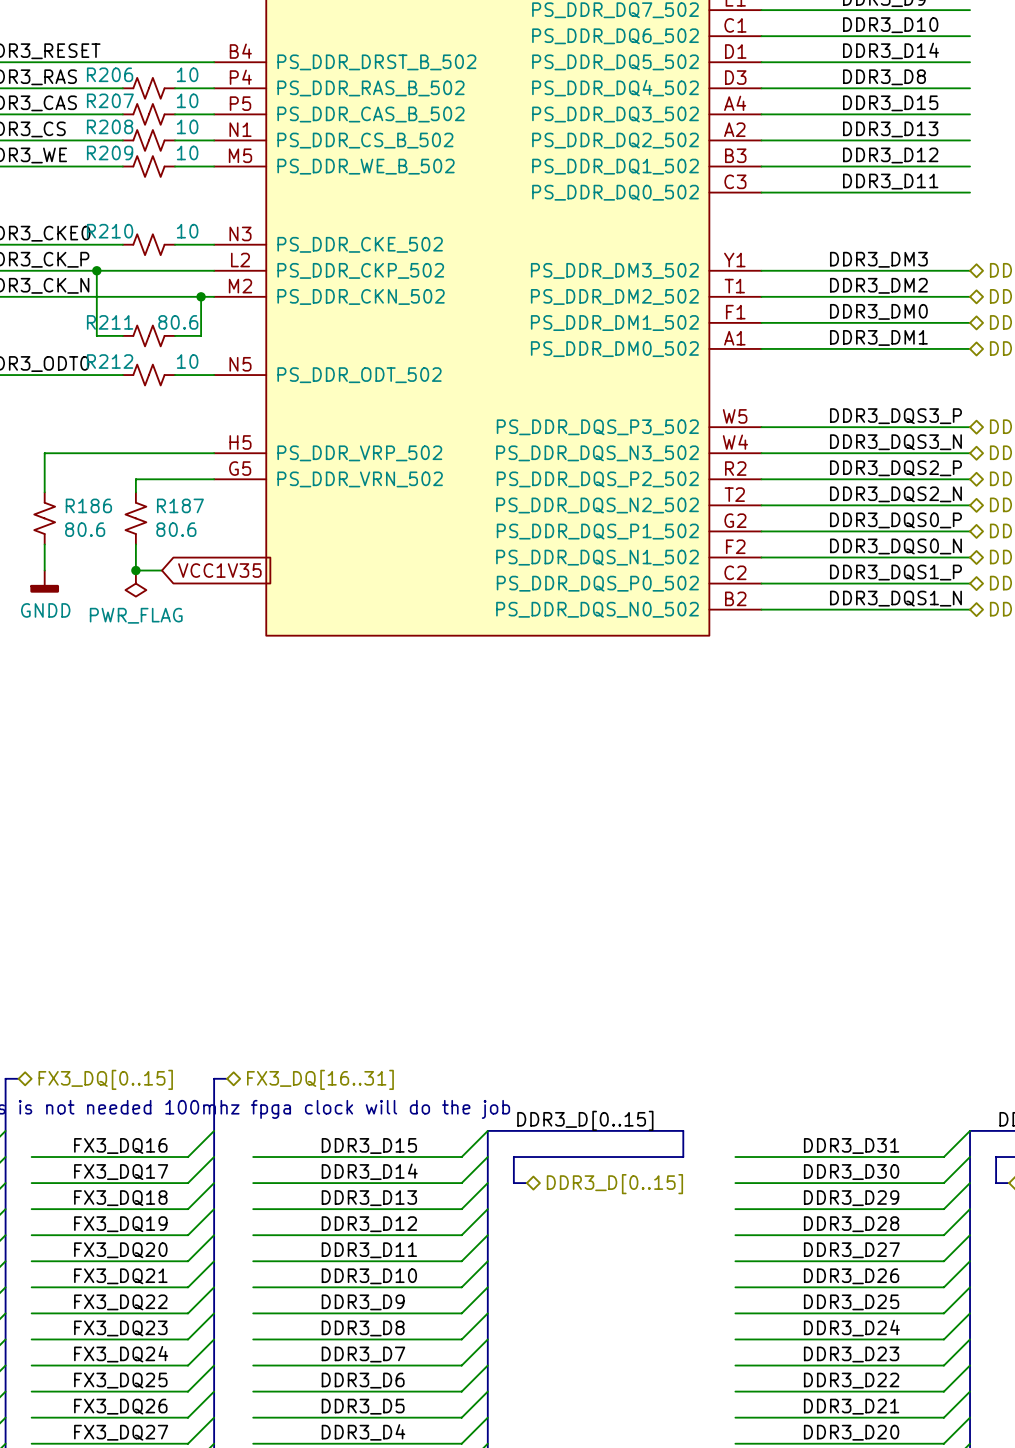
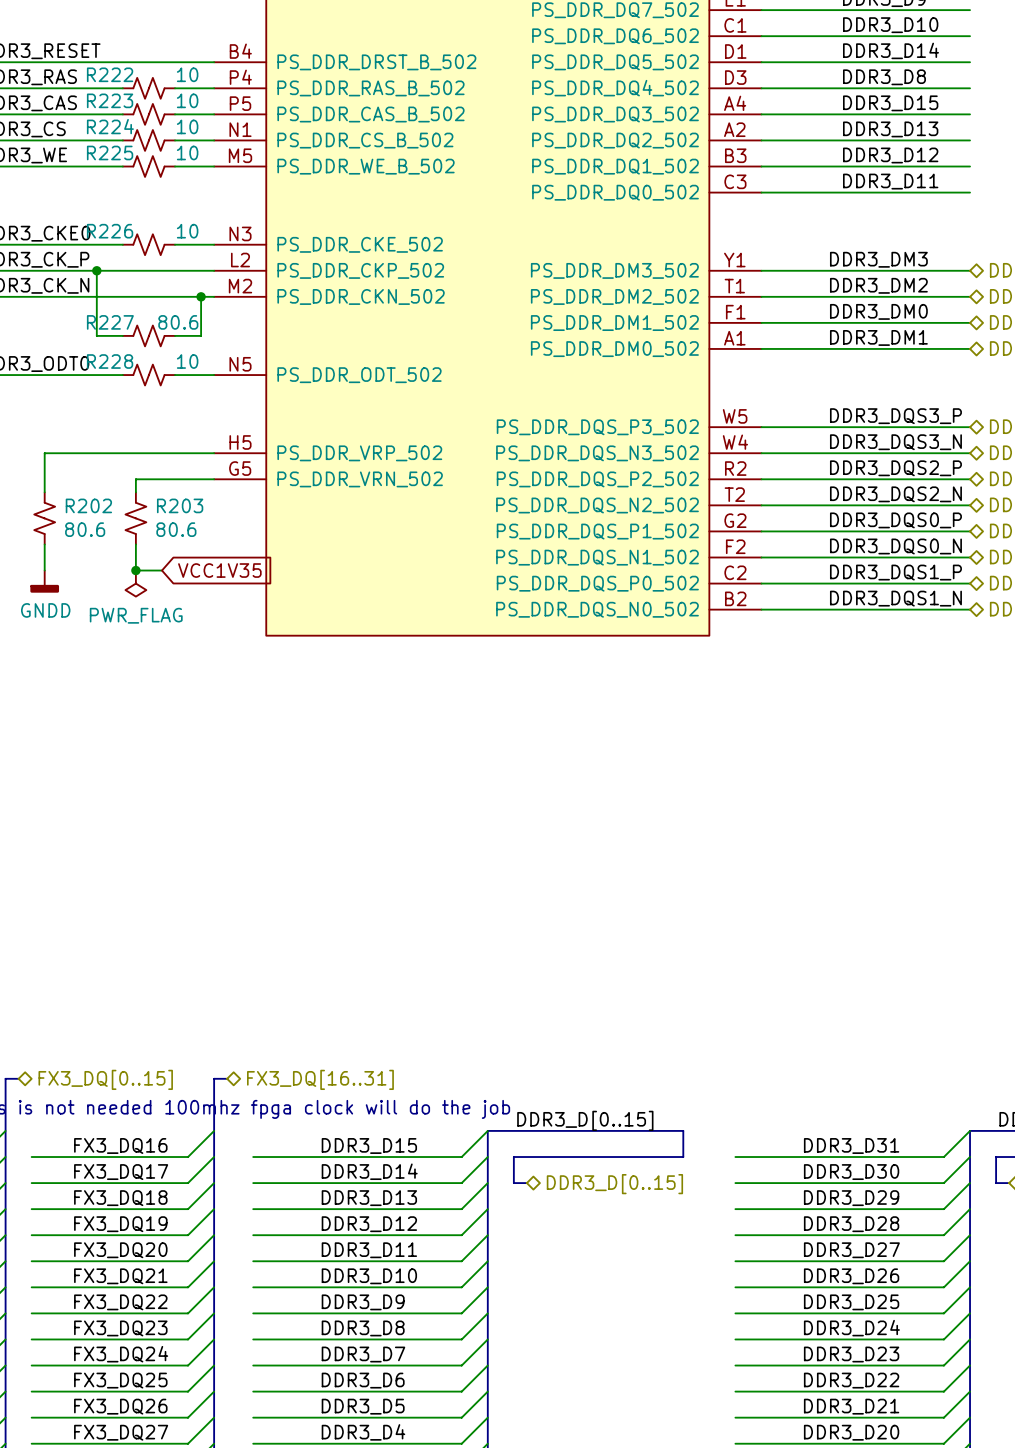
R206 name: R206 (110, 74) -> R222 (110, 74)
R207 name: R207 (110, 100) -> R223 (110, 100)
R208 name: R208 (110, 126) -> R224 (110, 126)
R209 name: R209 (110, 152) -> R225 (110, 152)
R210 name: R210 (110, 231) -> R226 (110, 231)
R211 name: R211 (110, 322) -> R227 (110, 322)
R212 name: R212 (110, 361) -> R228 (110, 361)
R186 name: R186 (88, 505) -> R202 (88, 505)
R187 name: R187 (180, 505) -> R203 (180, 505)

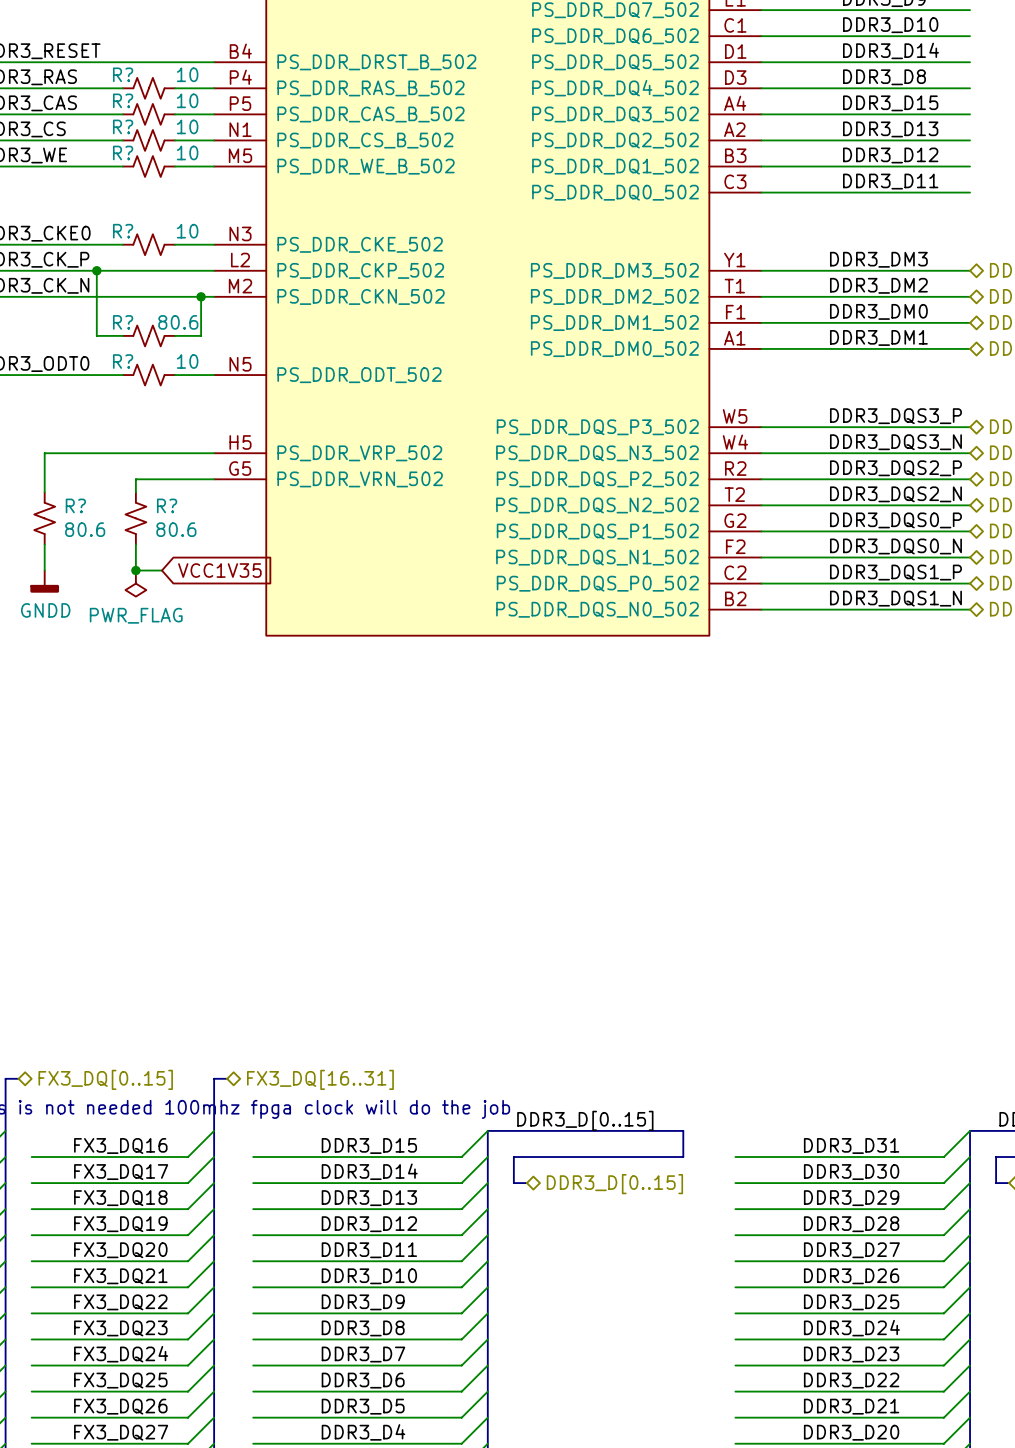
R222 name: R222 (110, 74) -> R? (123, 74)
R223 name: R223 (110, 100) -> R? (123, 100)
R224 name: R224 (110, 126) -> R? (123, 126)
R225 name: R225 (110, 152) -> R? (123, 152)
R226 name: R226 (110, 231) -> R? (123, 231)
R227 name: R227 (110, 322) -> R? (123, 322)
R228 name: R228 (110, 361) -> R? (123, 361)
R202 name: R202 (88, 505) -> R? (75, 505)
R203 name: R203 (180, 505) -> R? (167, 505)

